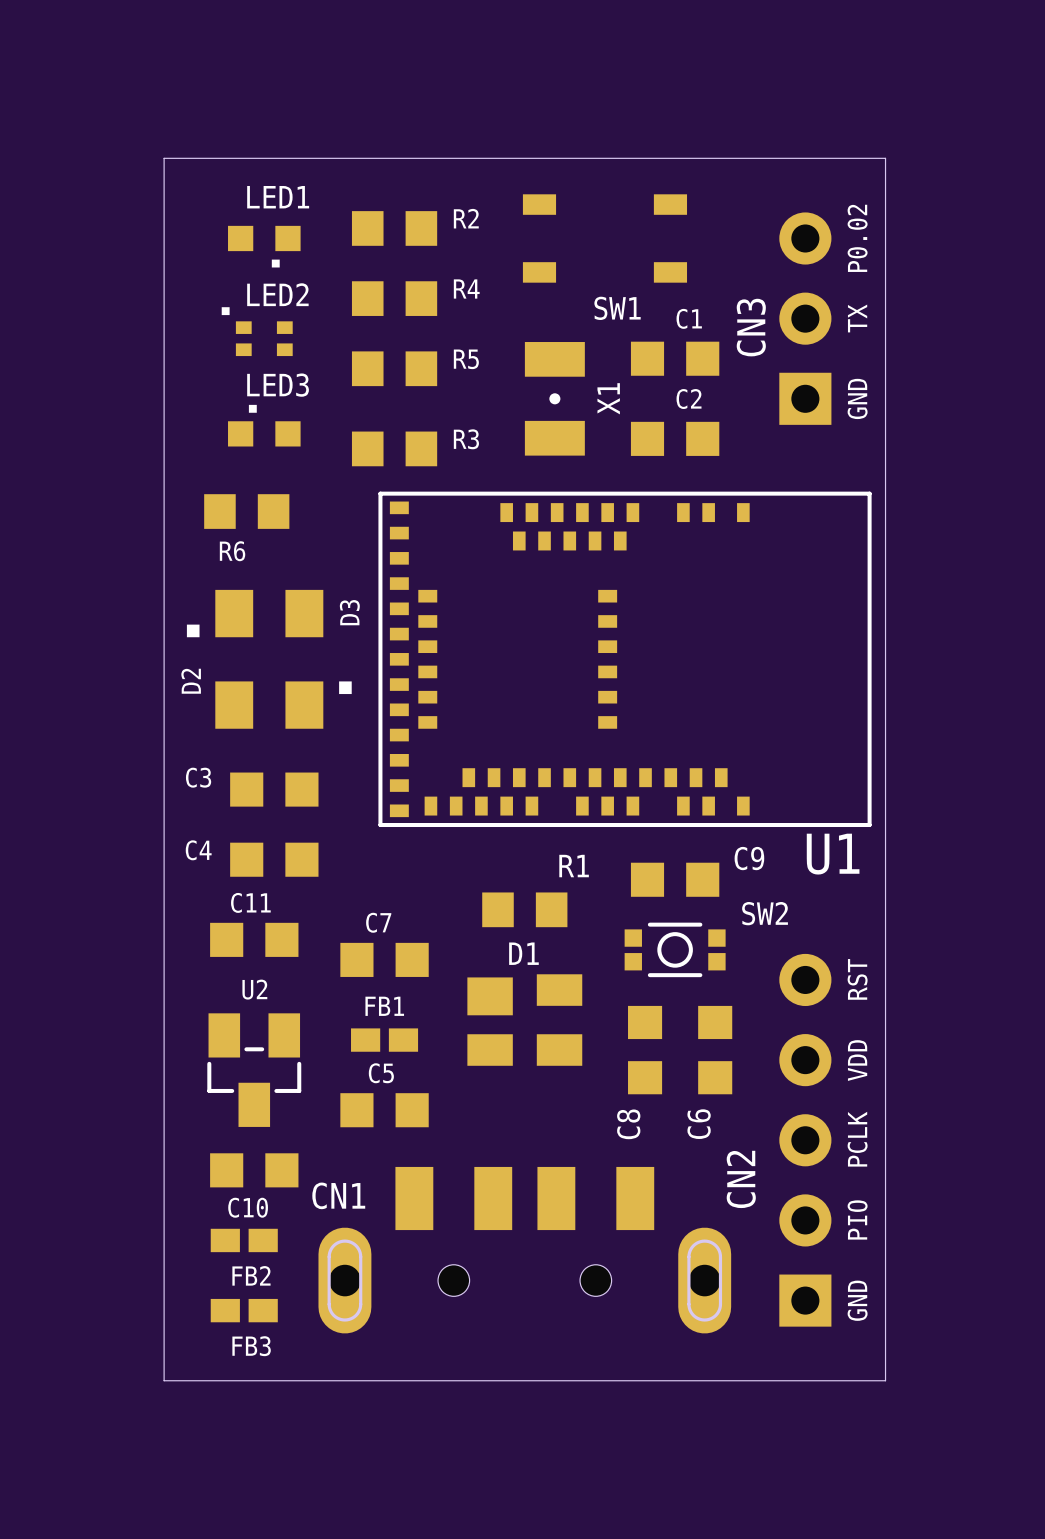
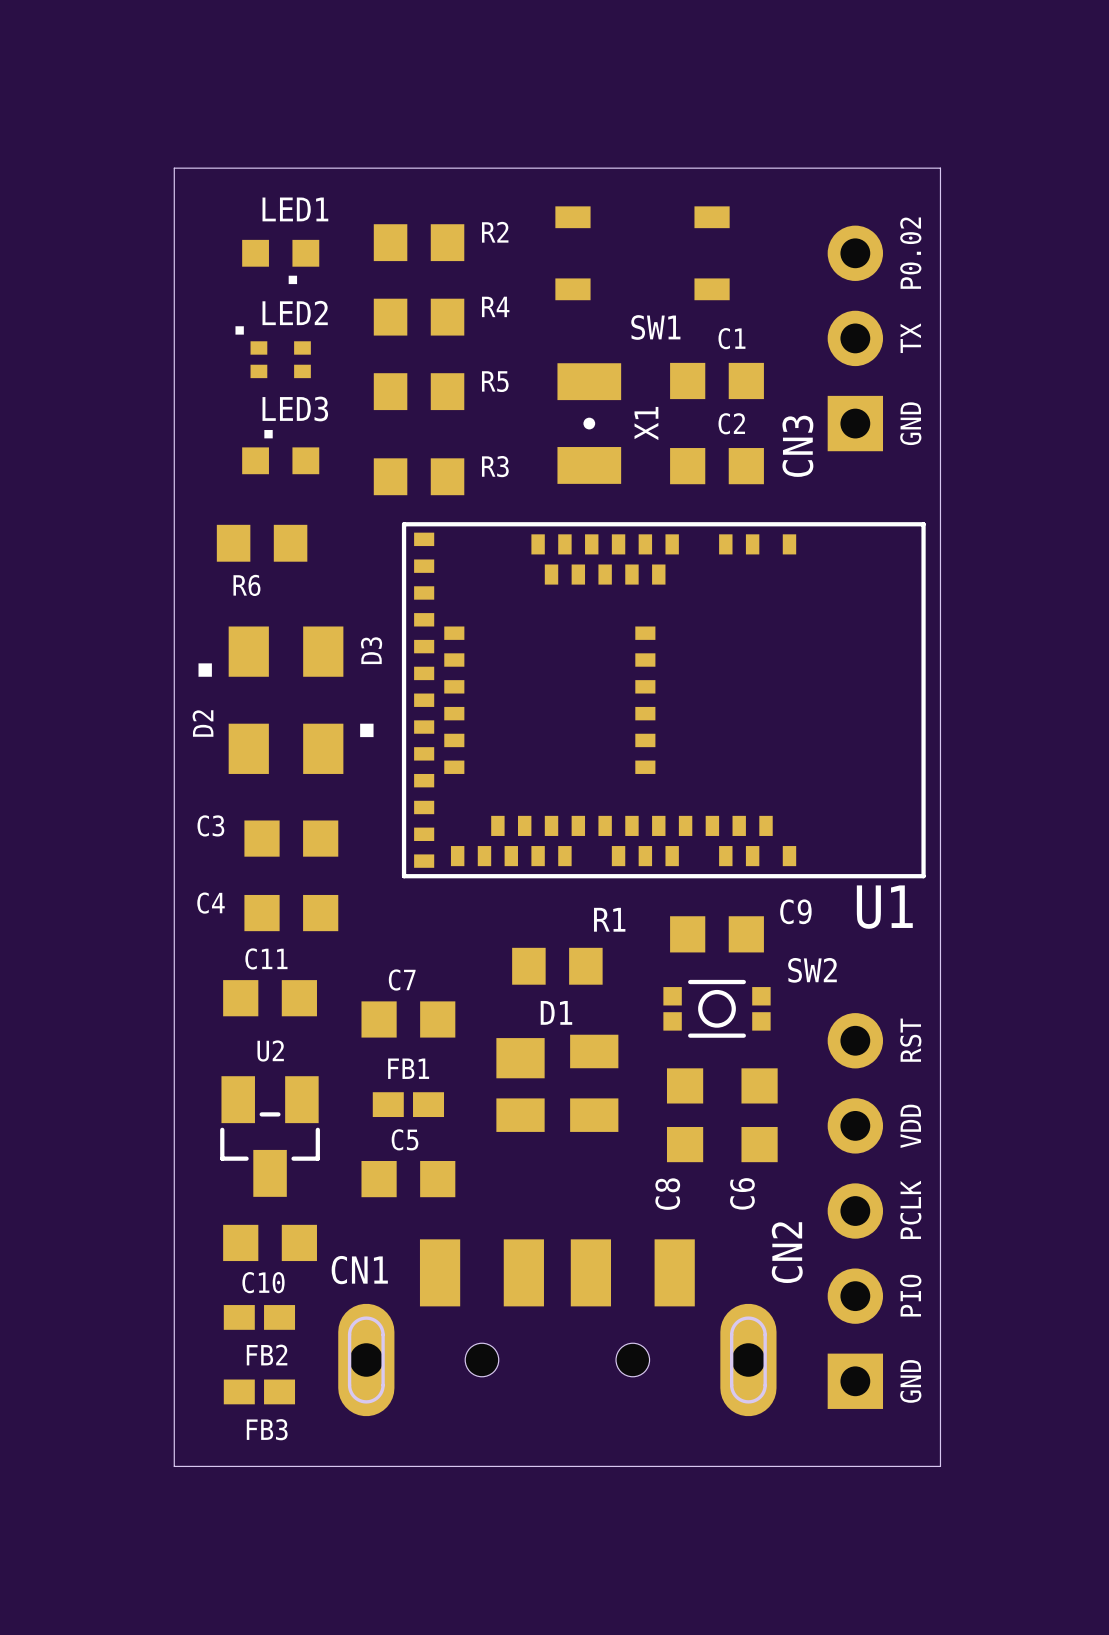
CN3 name position: CN3 (751, 327) -> CN3 (797, 446)

